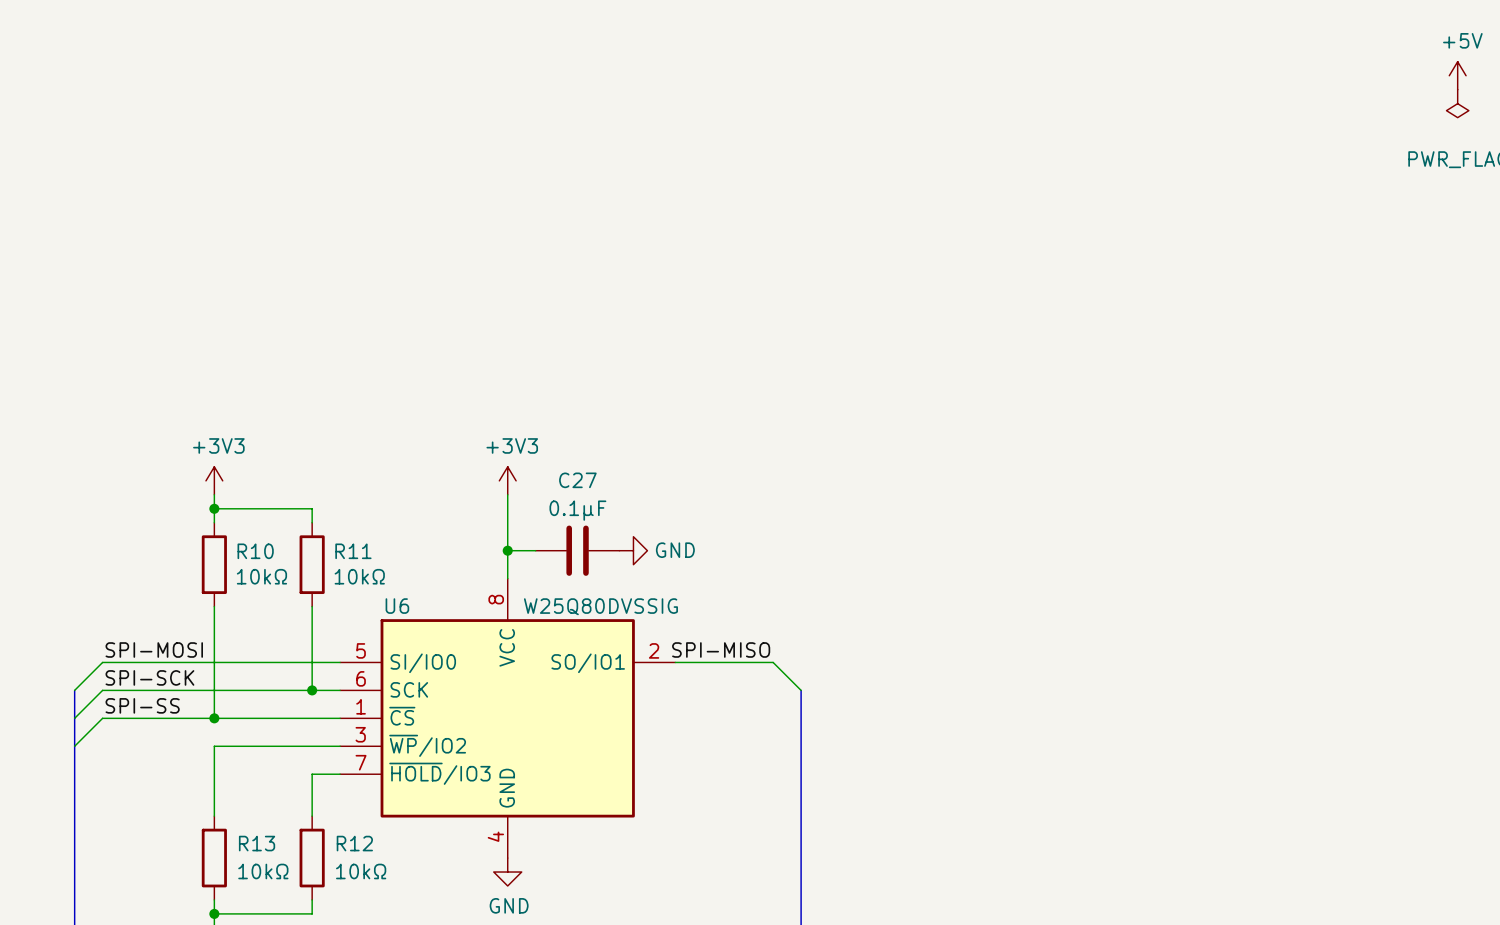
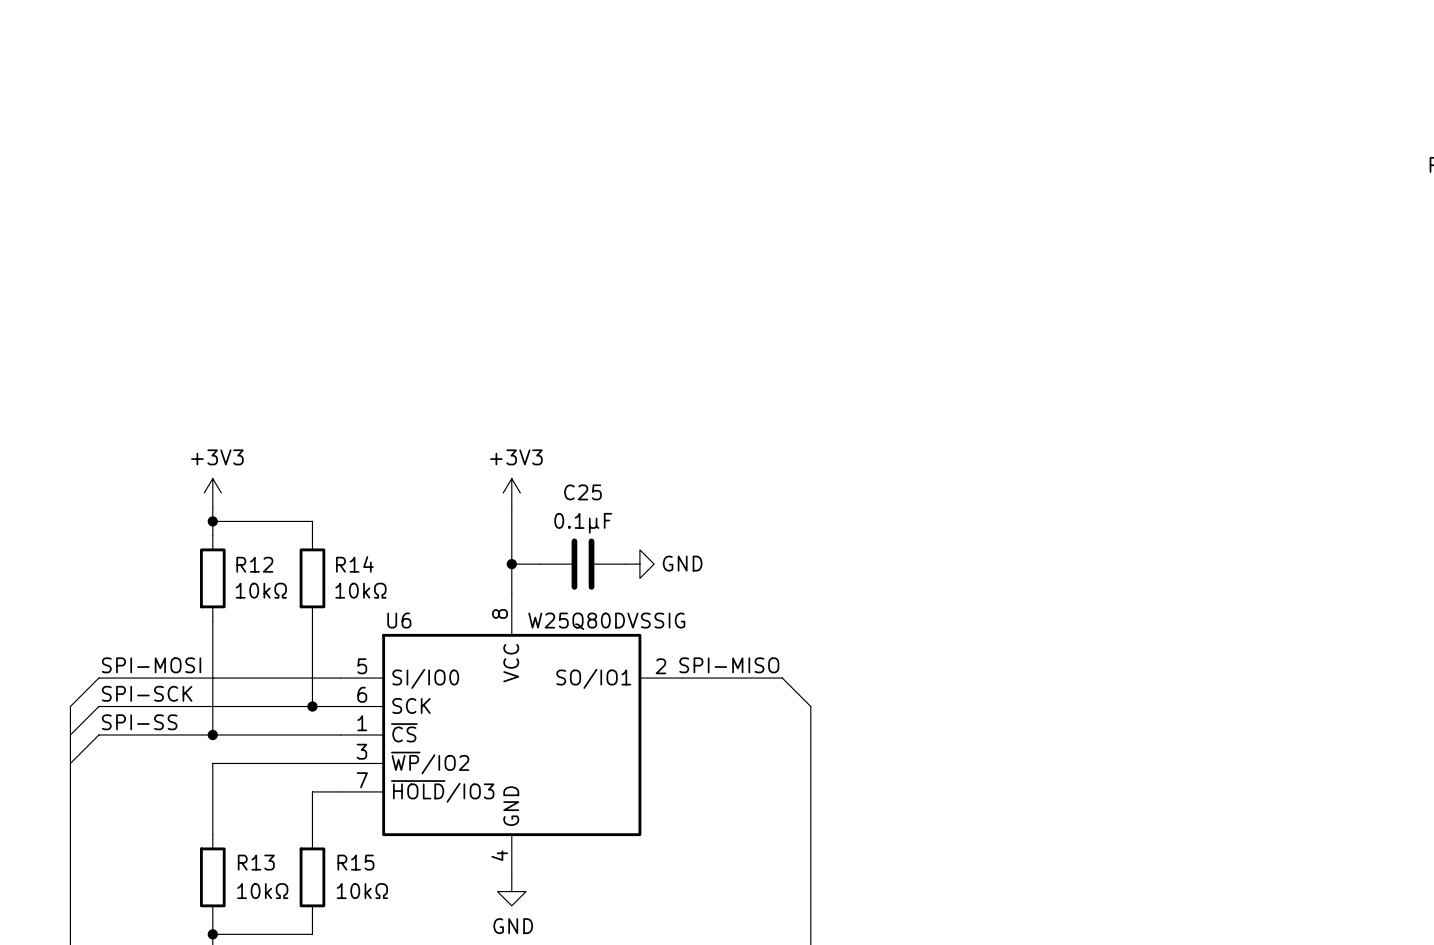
C27 name: C27 (577, 480) -> C25 (582, 492)
R10 name: R10 (255, 551) -> R12 (254, 564)
R11 name: R11 (353, 551) -> R14 (354, 564)
R12 name: R12 (354, 843) -> R15 (355, 862)

